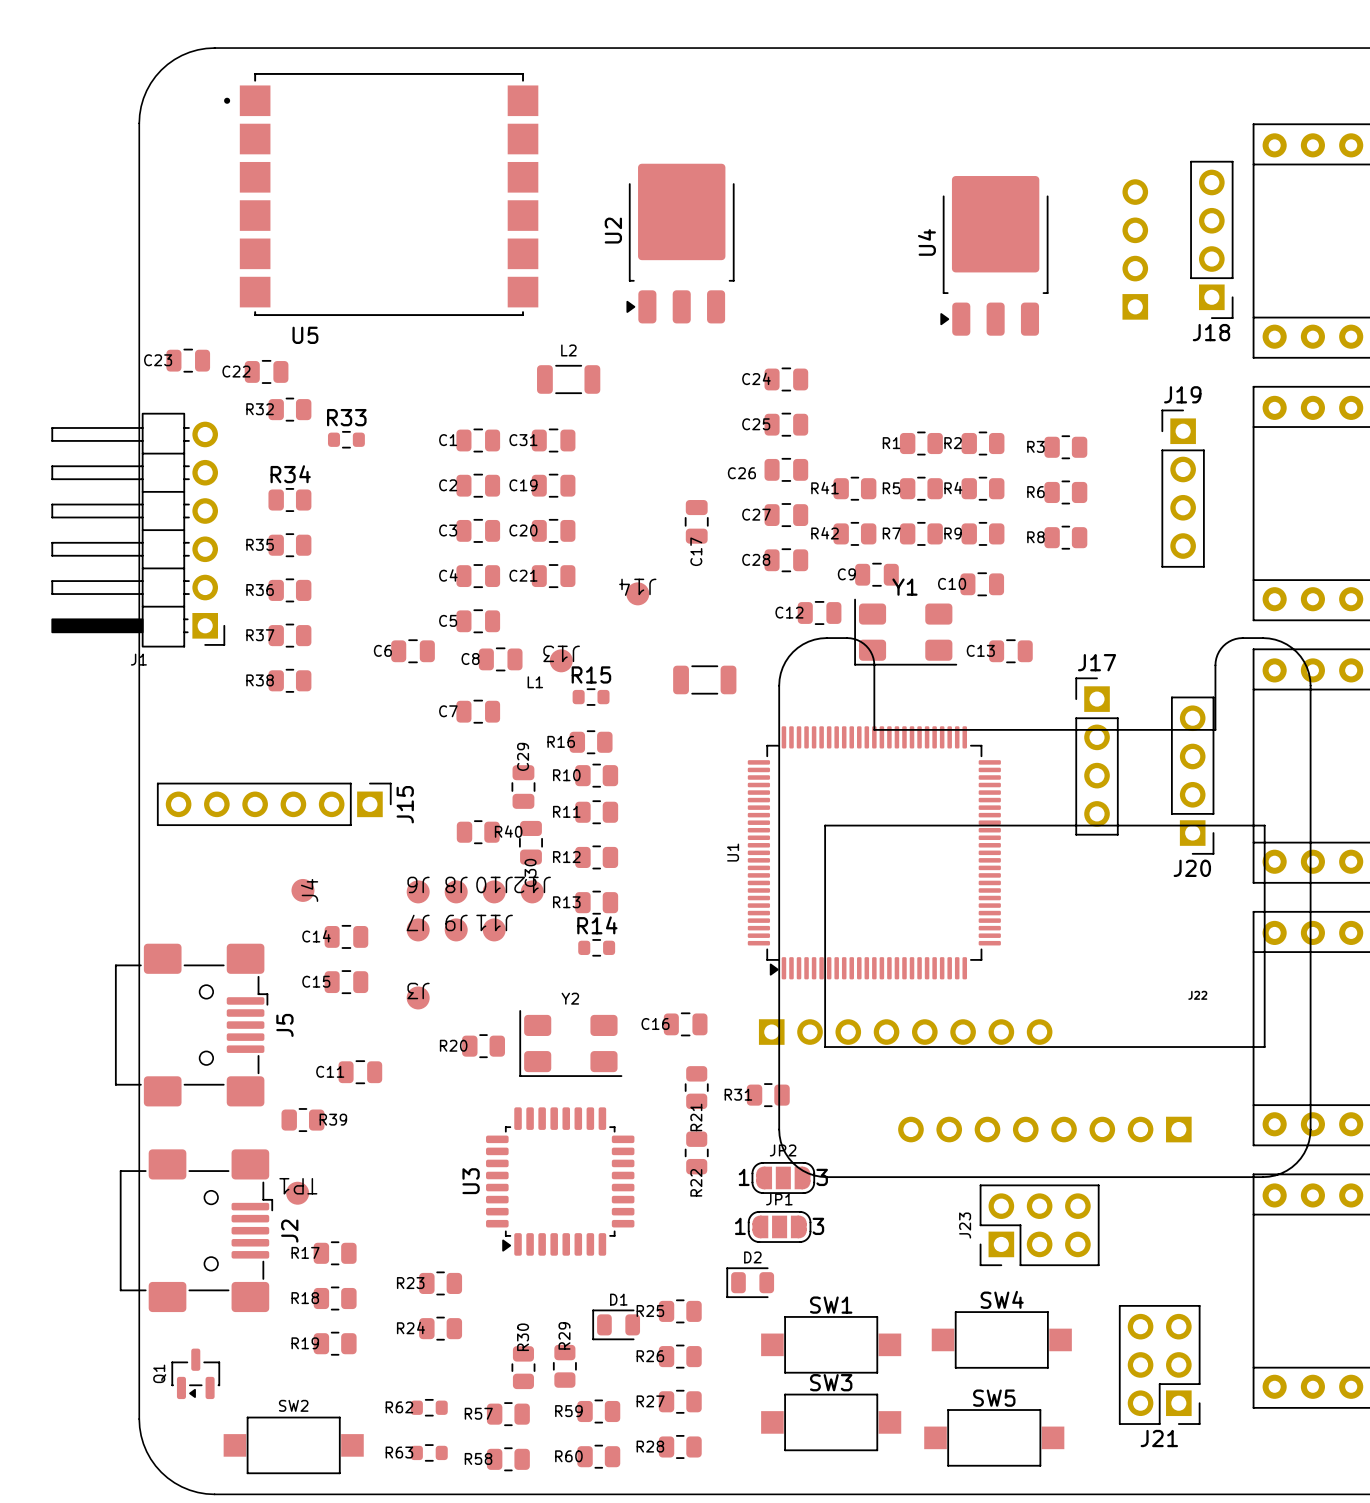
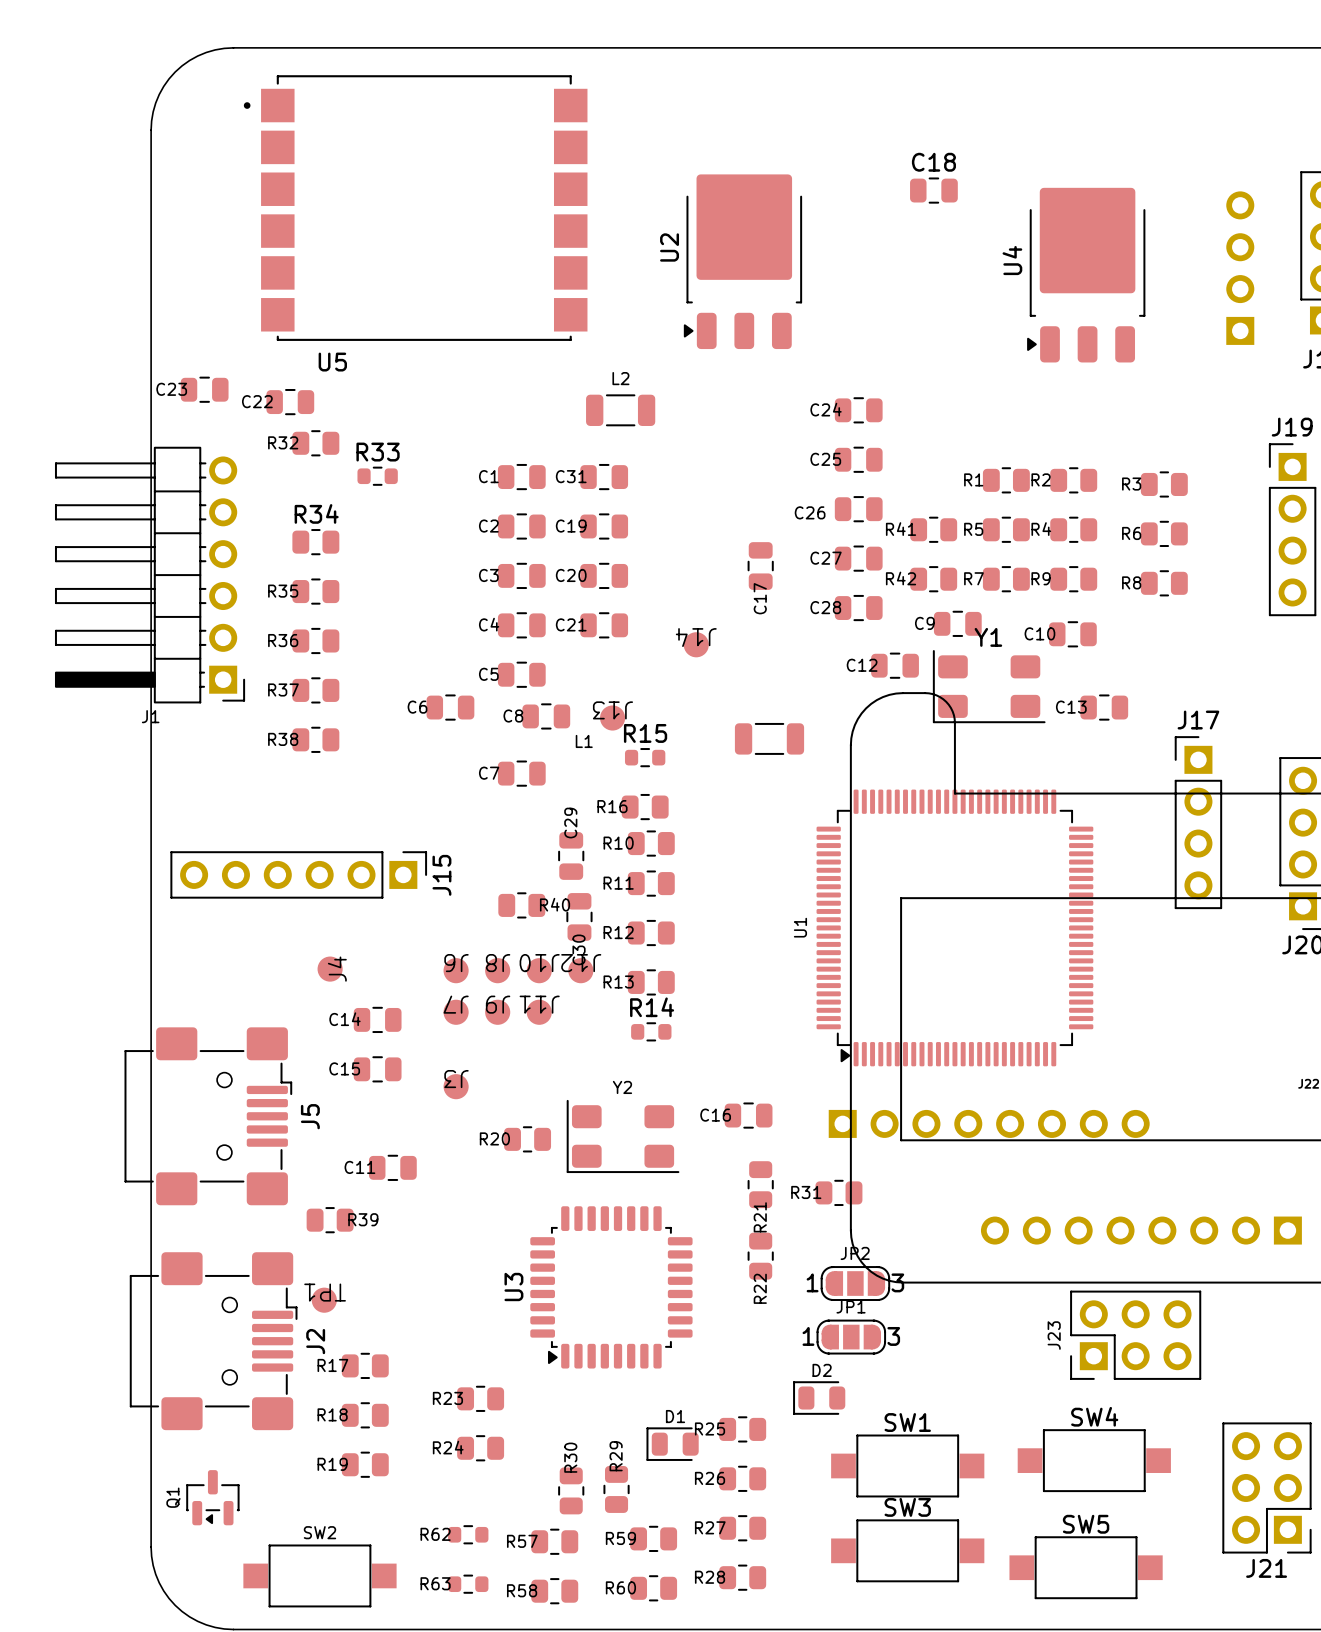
C18: none -> (933, 190)

